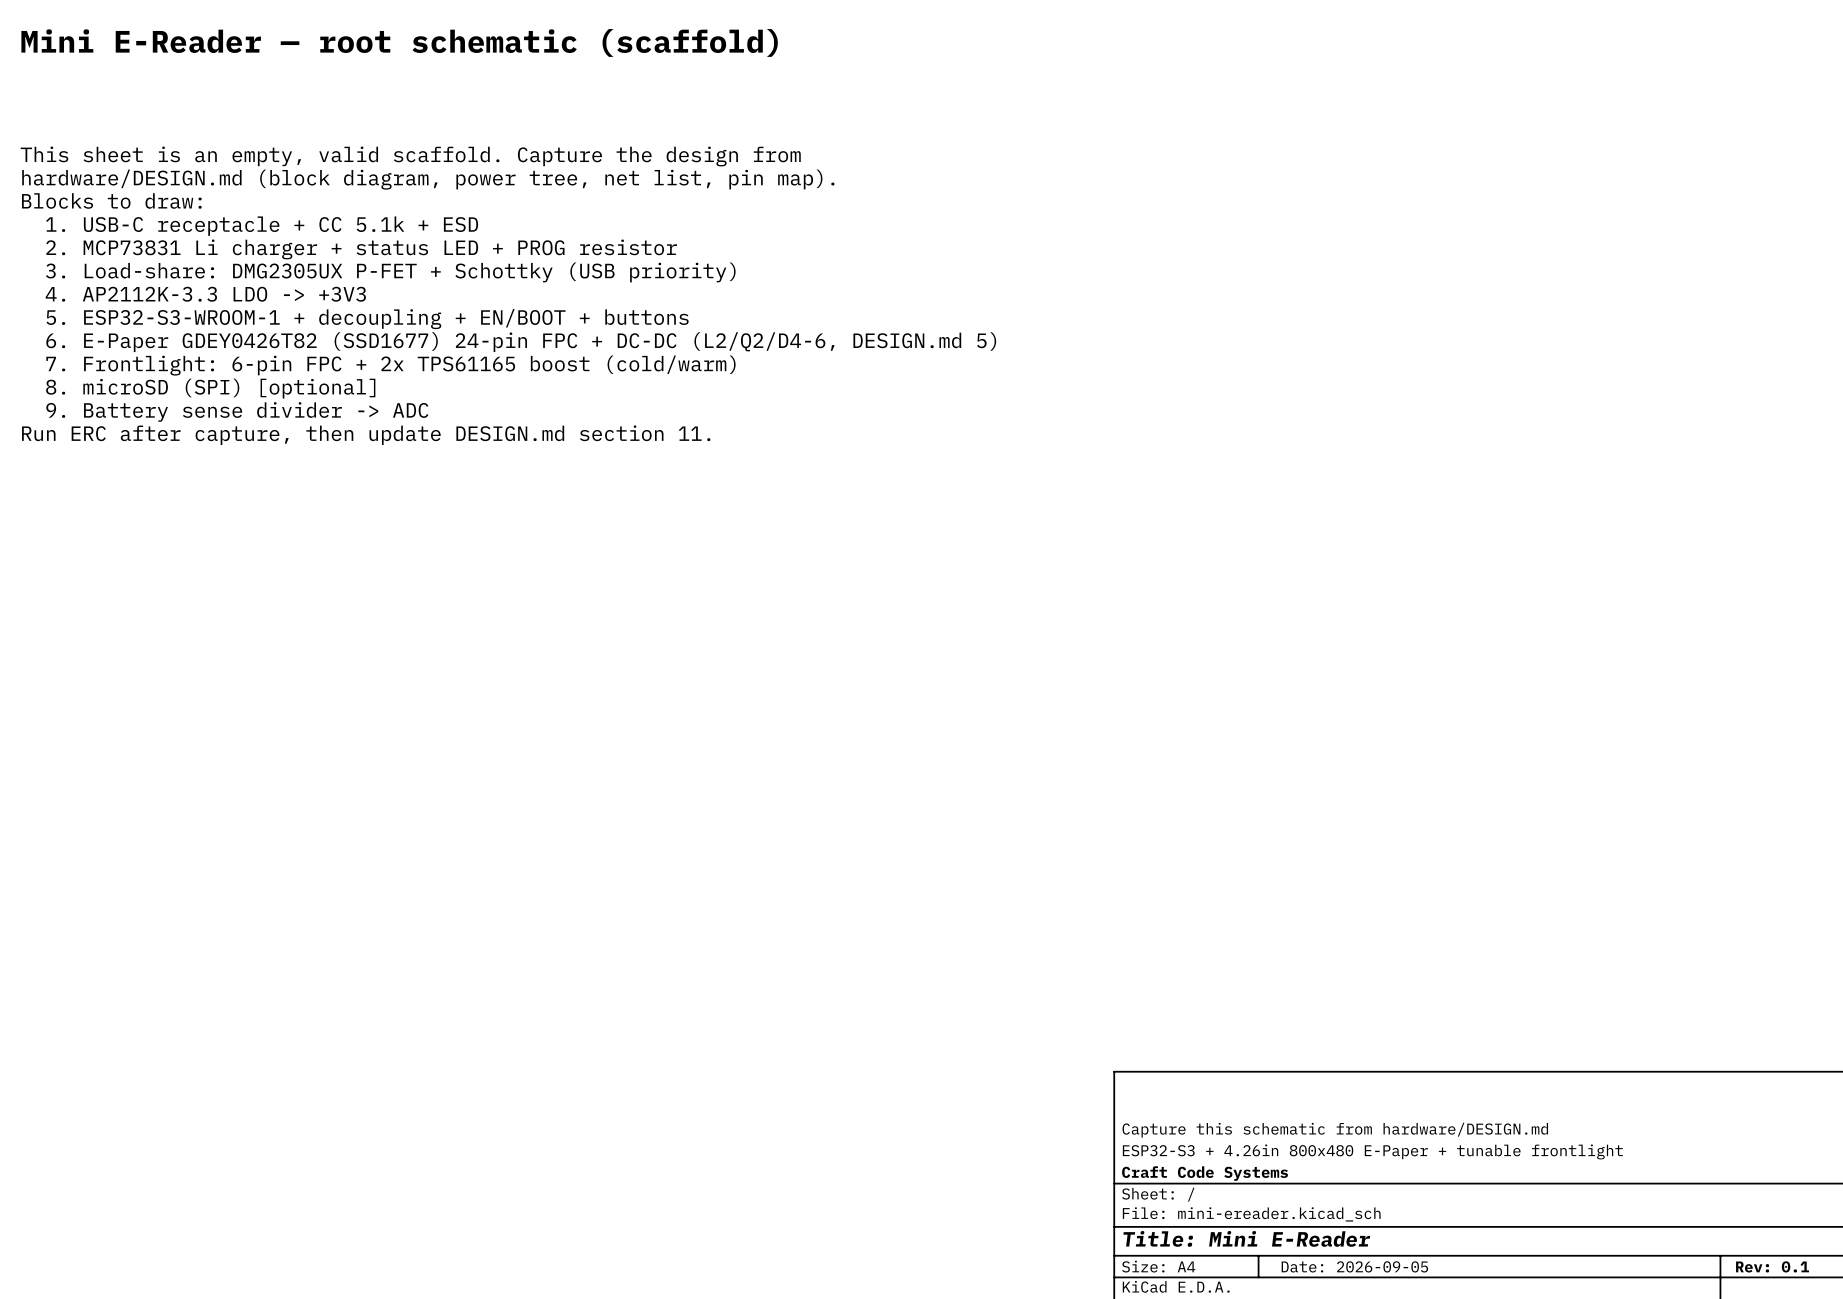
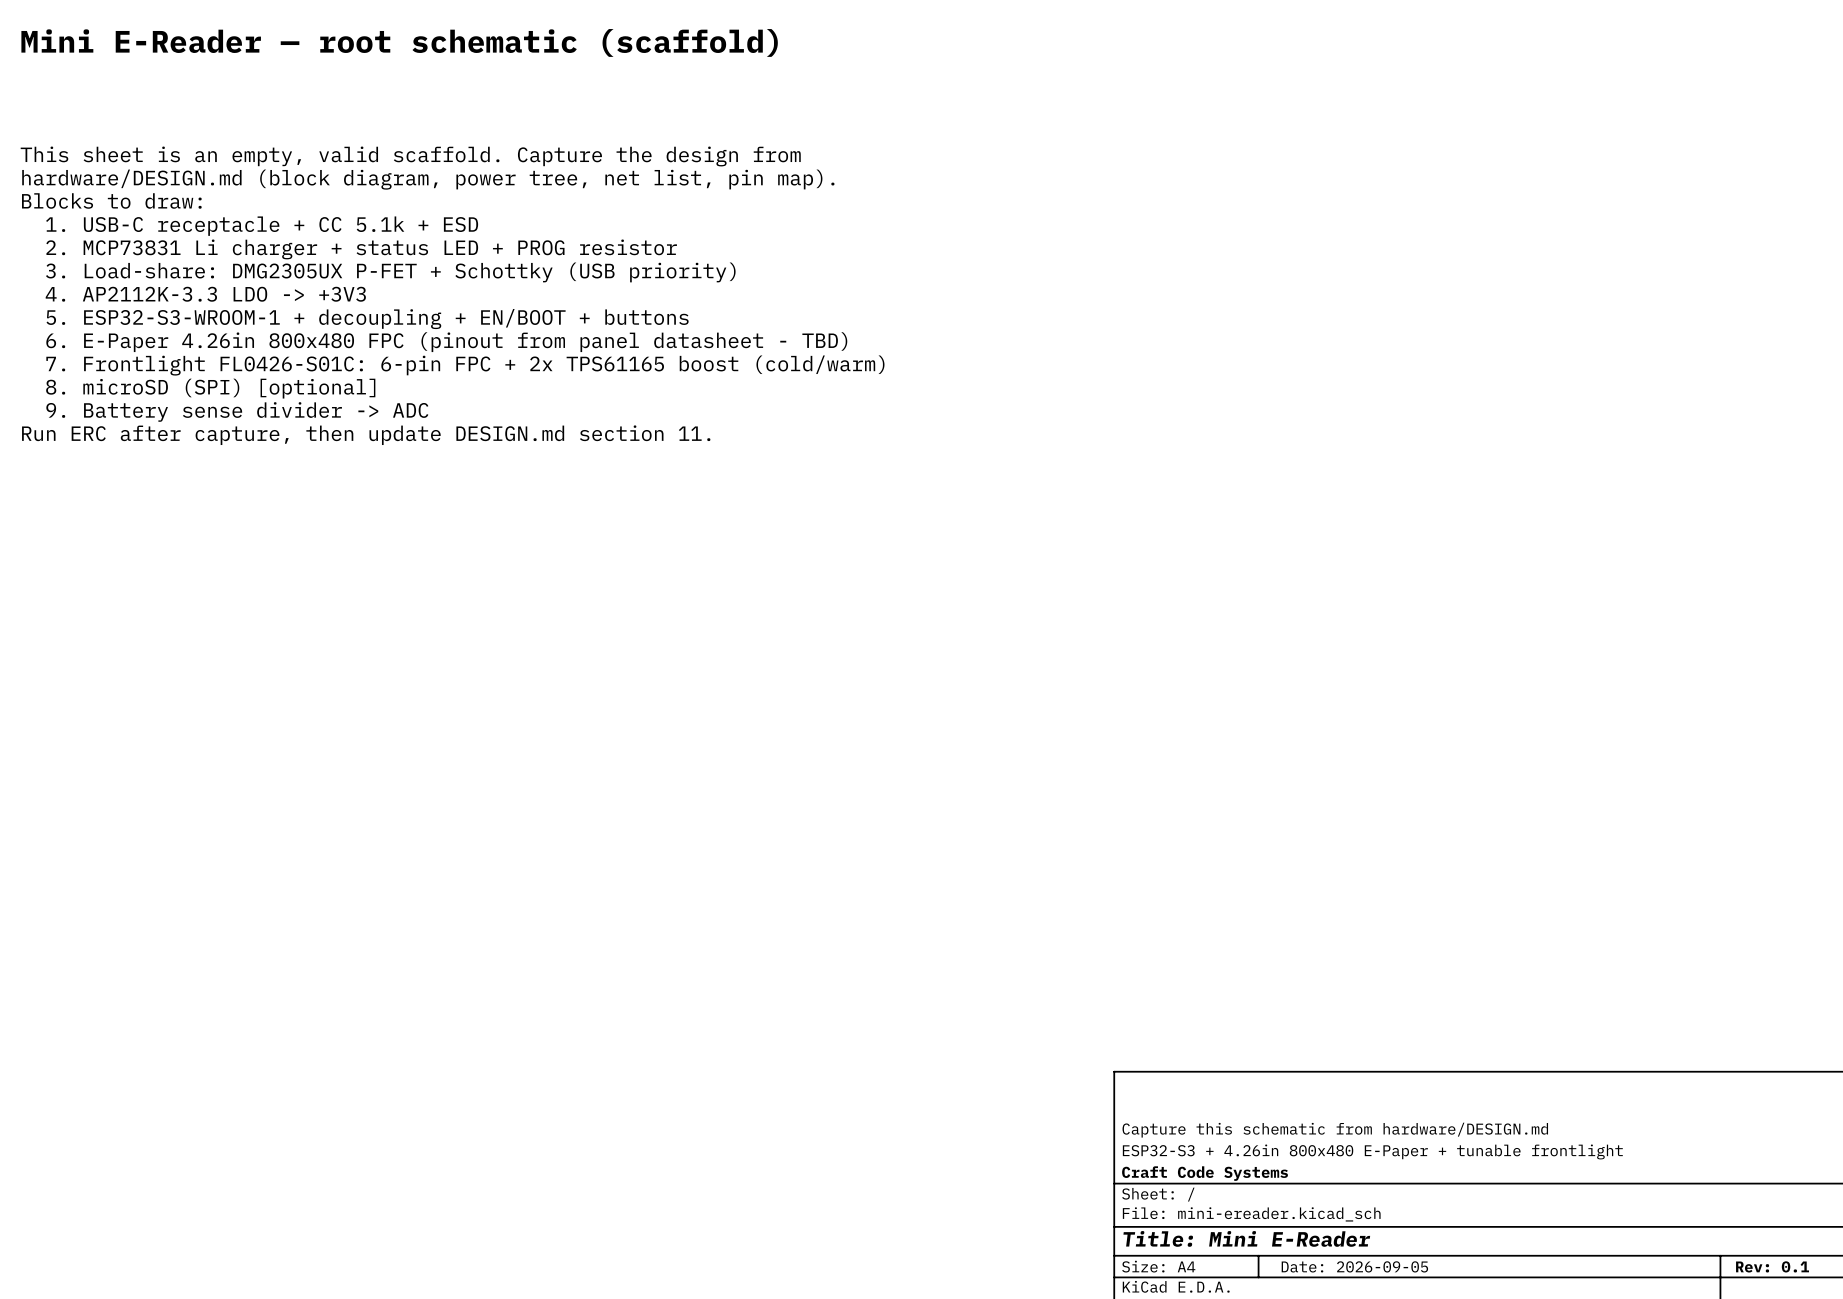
text: 6. E-Paper GDEY0426T82 (SSD1677) 24-pin FPC + DC-DC (L2/Q2/D4-6, DESIGN.md 5) (521, 342) -> 6. E-Paper 4.26in 800x480 FPC (pinout from panel datasheet - TBD) (446, 342)
text: 7. Frontlight: 6-pin FPC + 2x TPS61165 boost (cold/warm) (390, 365) -> 7. Frontlight FL0426-S01C: 6-pin FPC + 2x TPS61165 boost (cold/warm) (465, 365)

